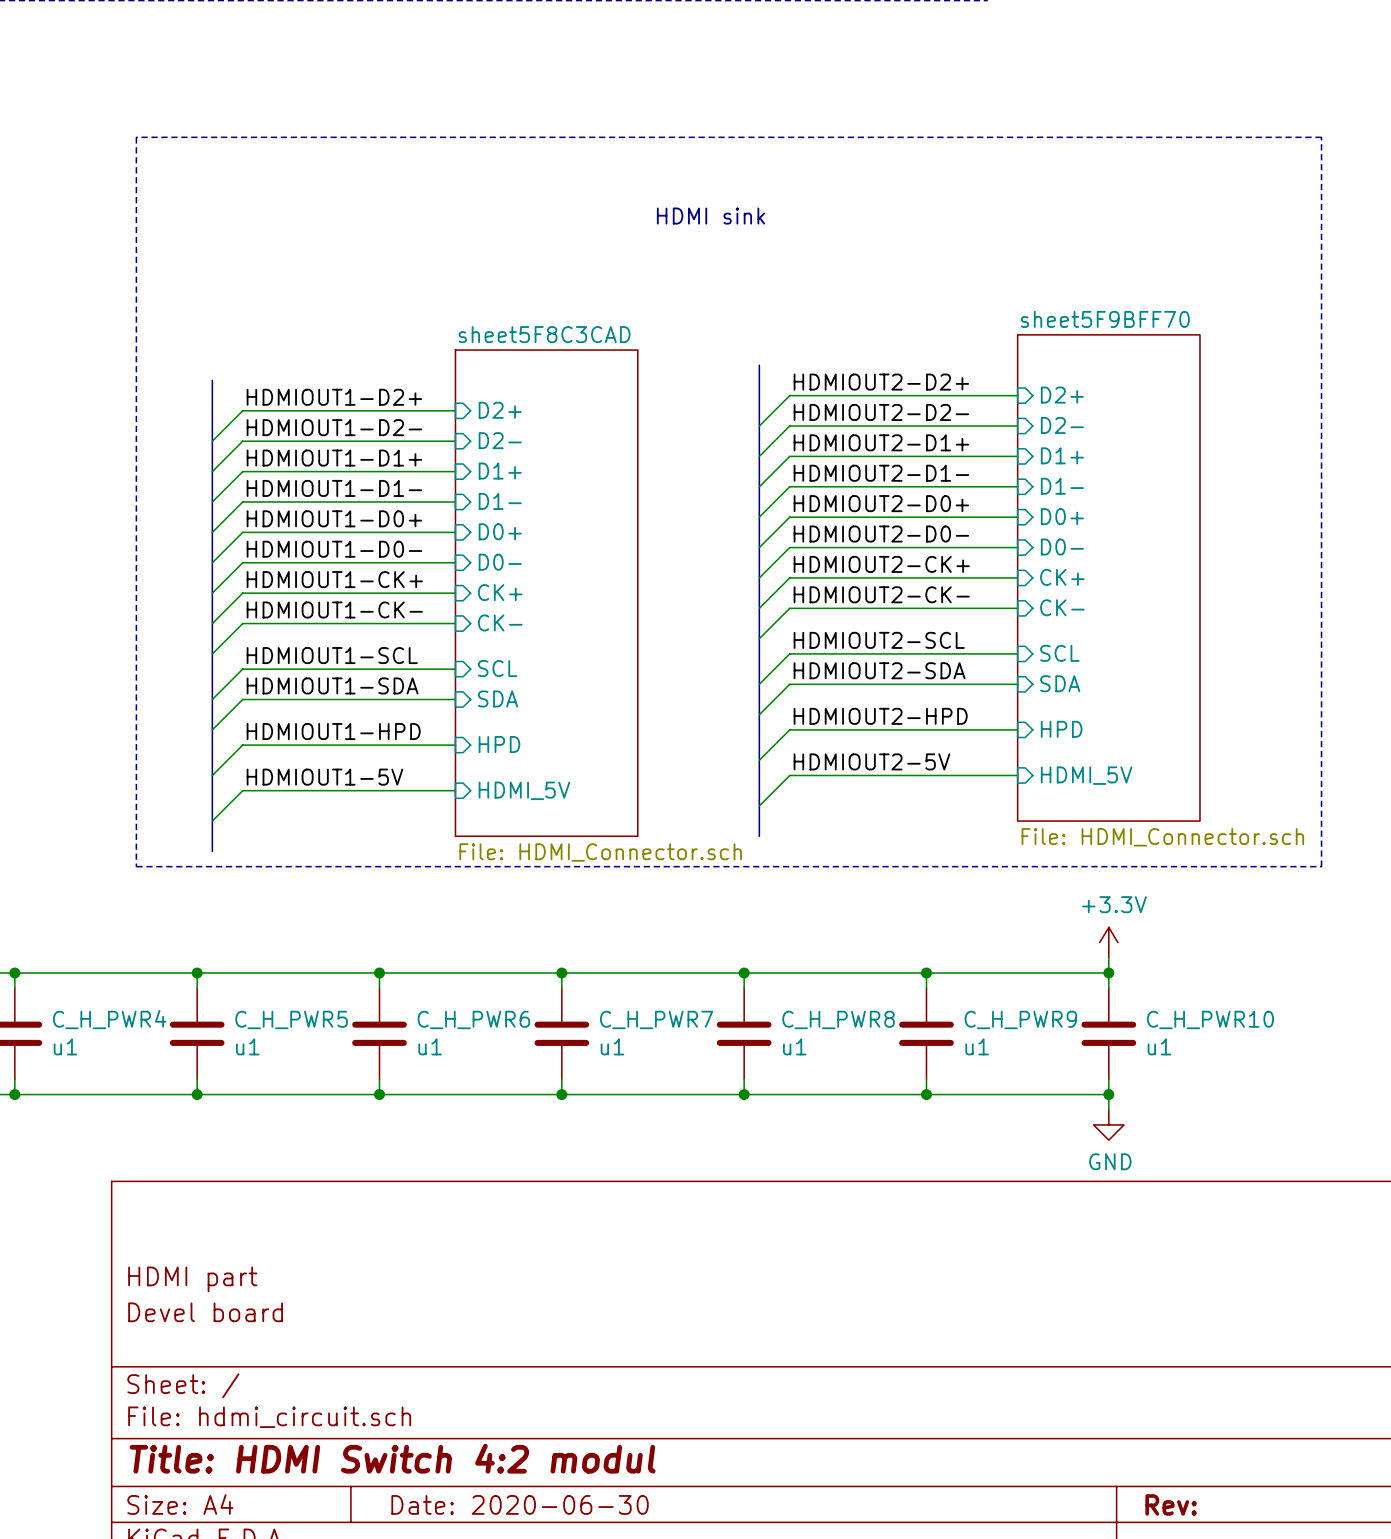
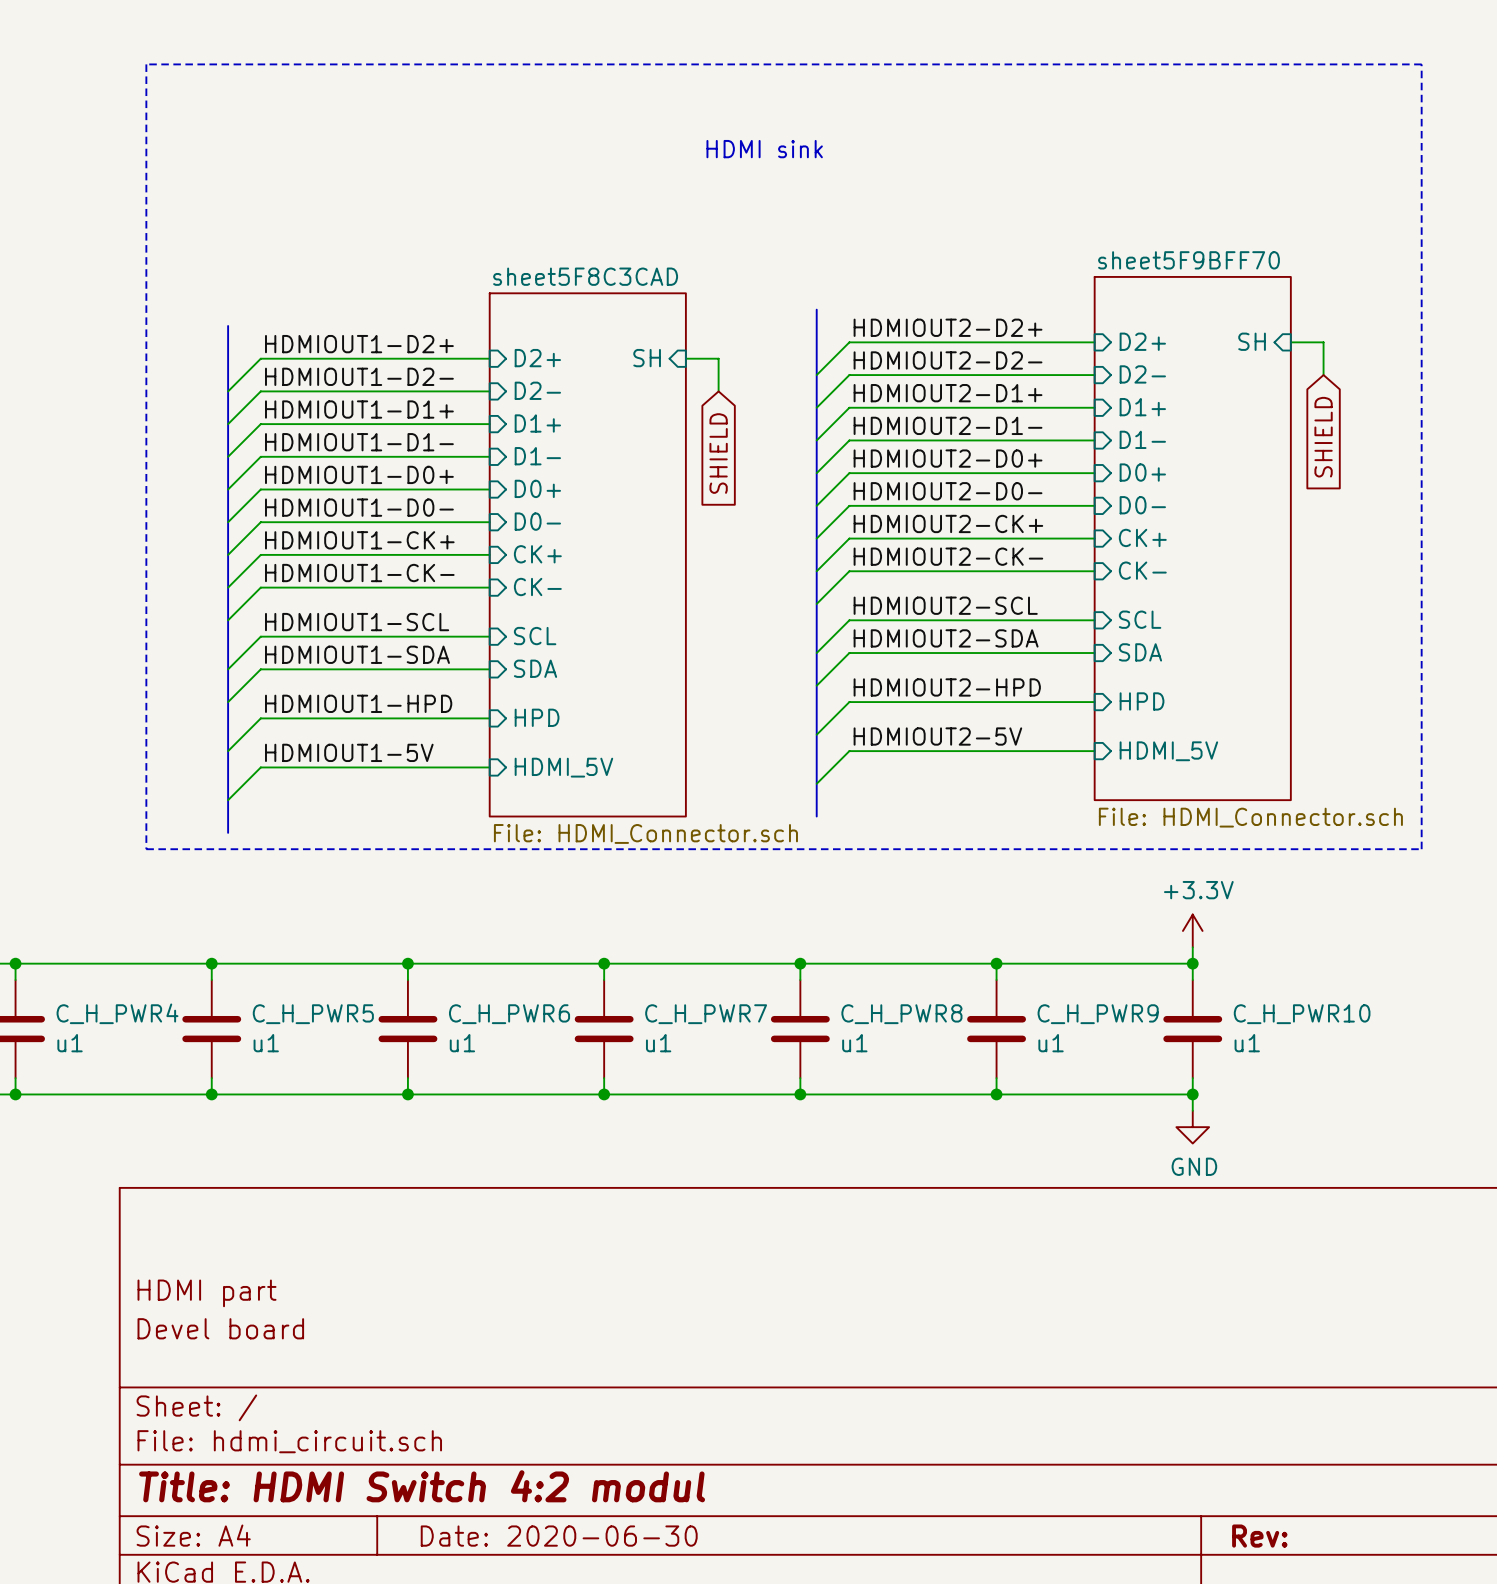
sheet pin: none -> SH (1252, 341)
wire: none -> (1290, 342) (1323, 342) (1323, 375)
sheet pin: none -> SH (647, 358)
wire: none -> (685, 358) (718, 358) (718, 391)
global label: none -> SHIELD (1323, 437)
global label: none -> SHIELD (718, 453)

